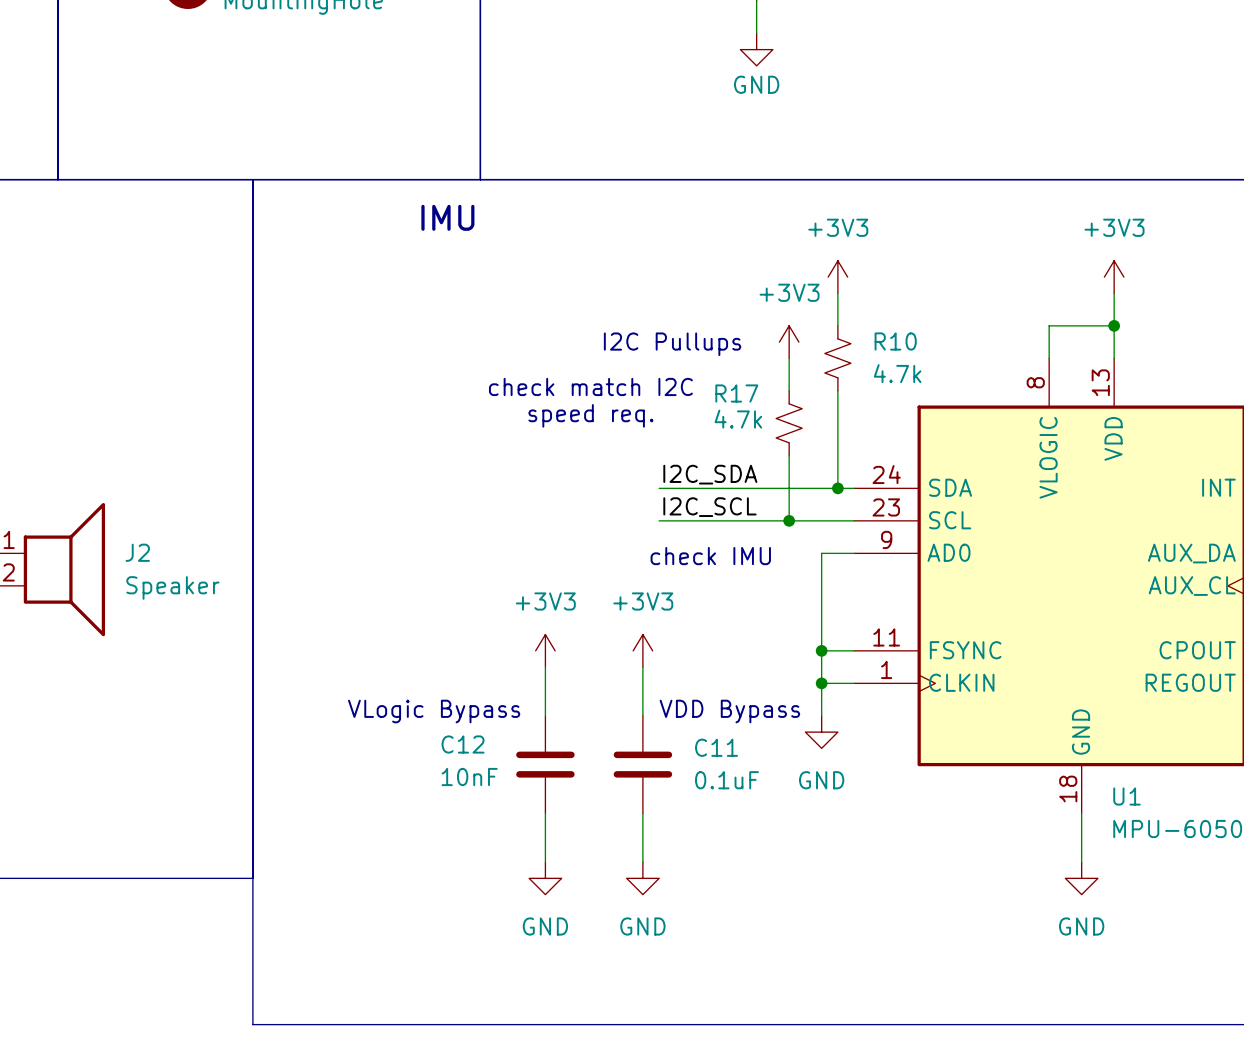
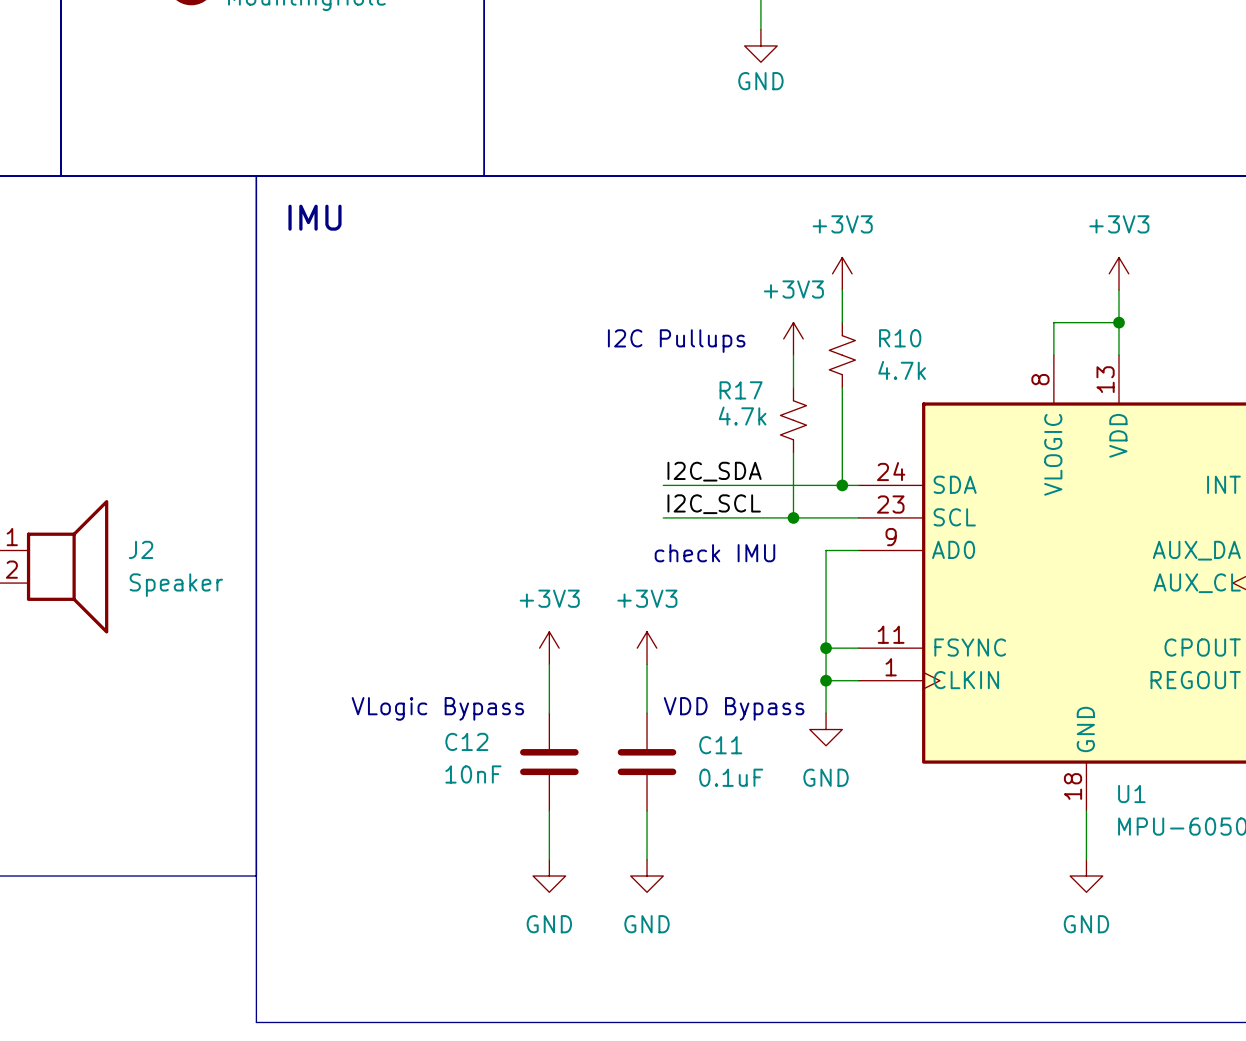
text position: IMU (447, 217) -> IMU (314, 217)
text: check match I2C (590, 386) -> none
text: speed req. (590, 415) -> none

